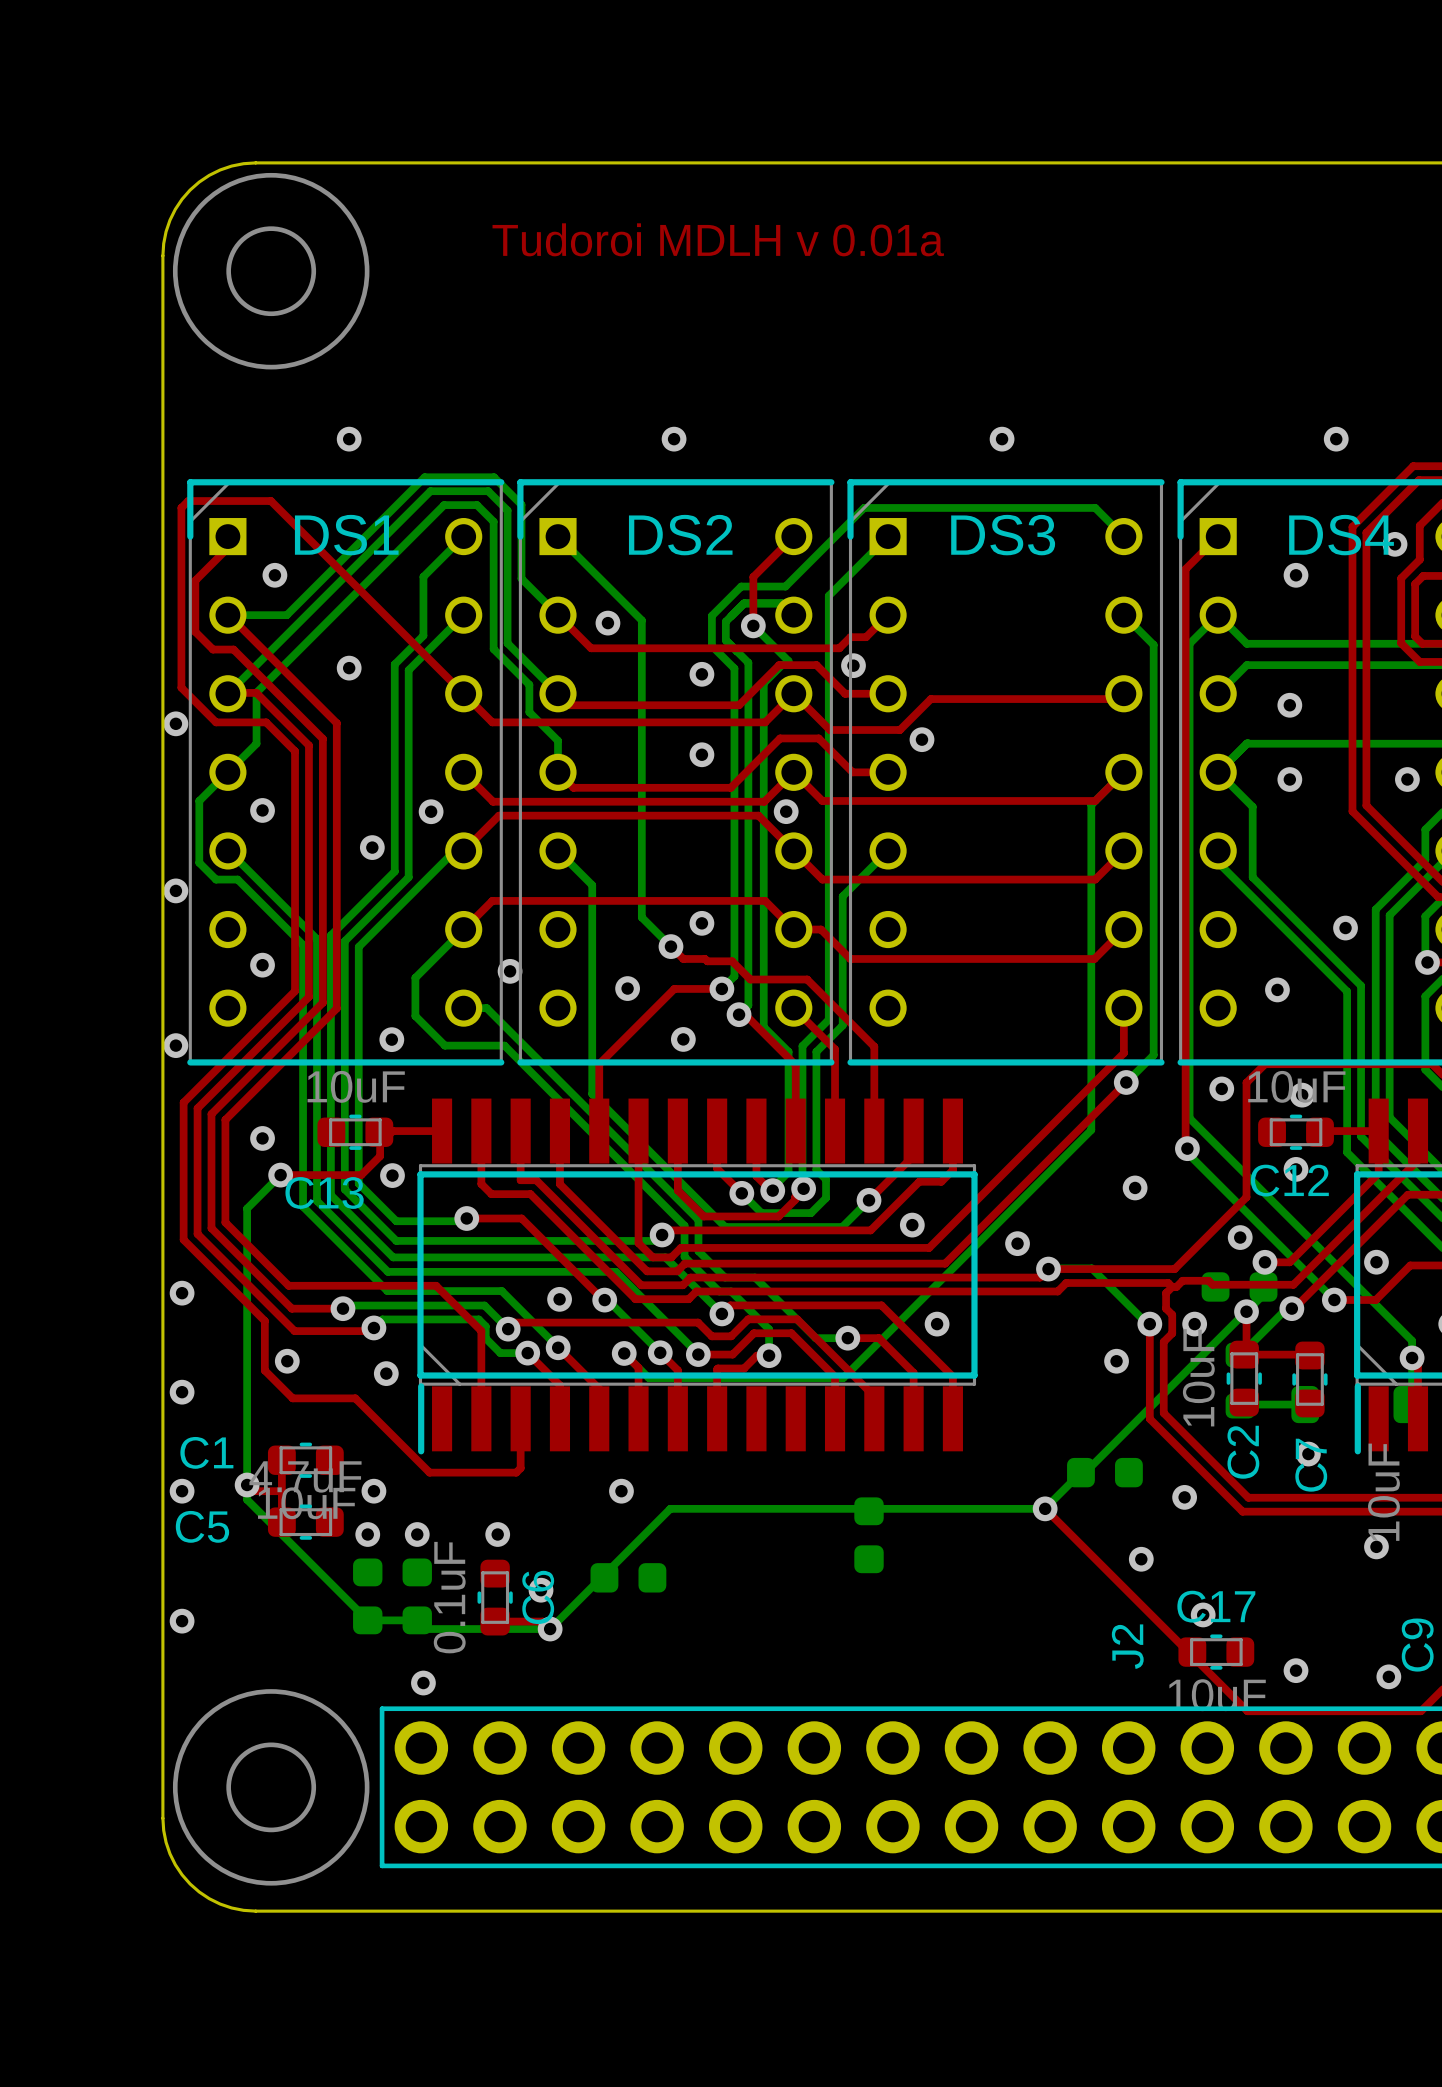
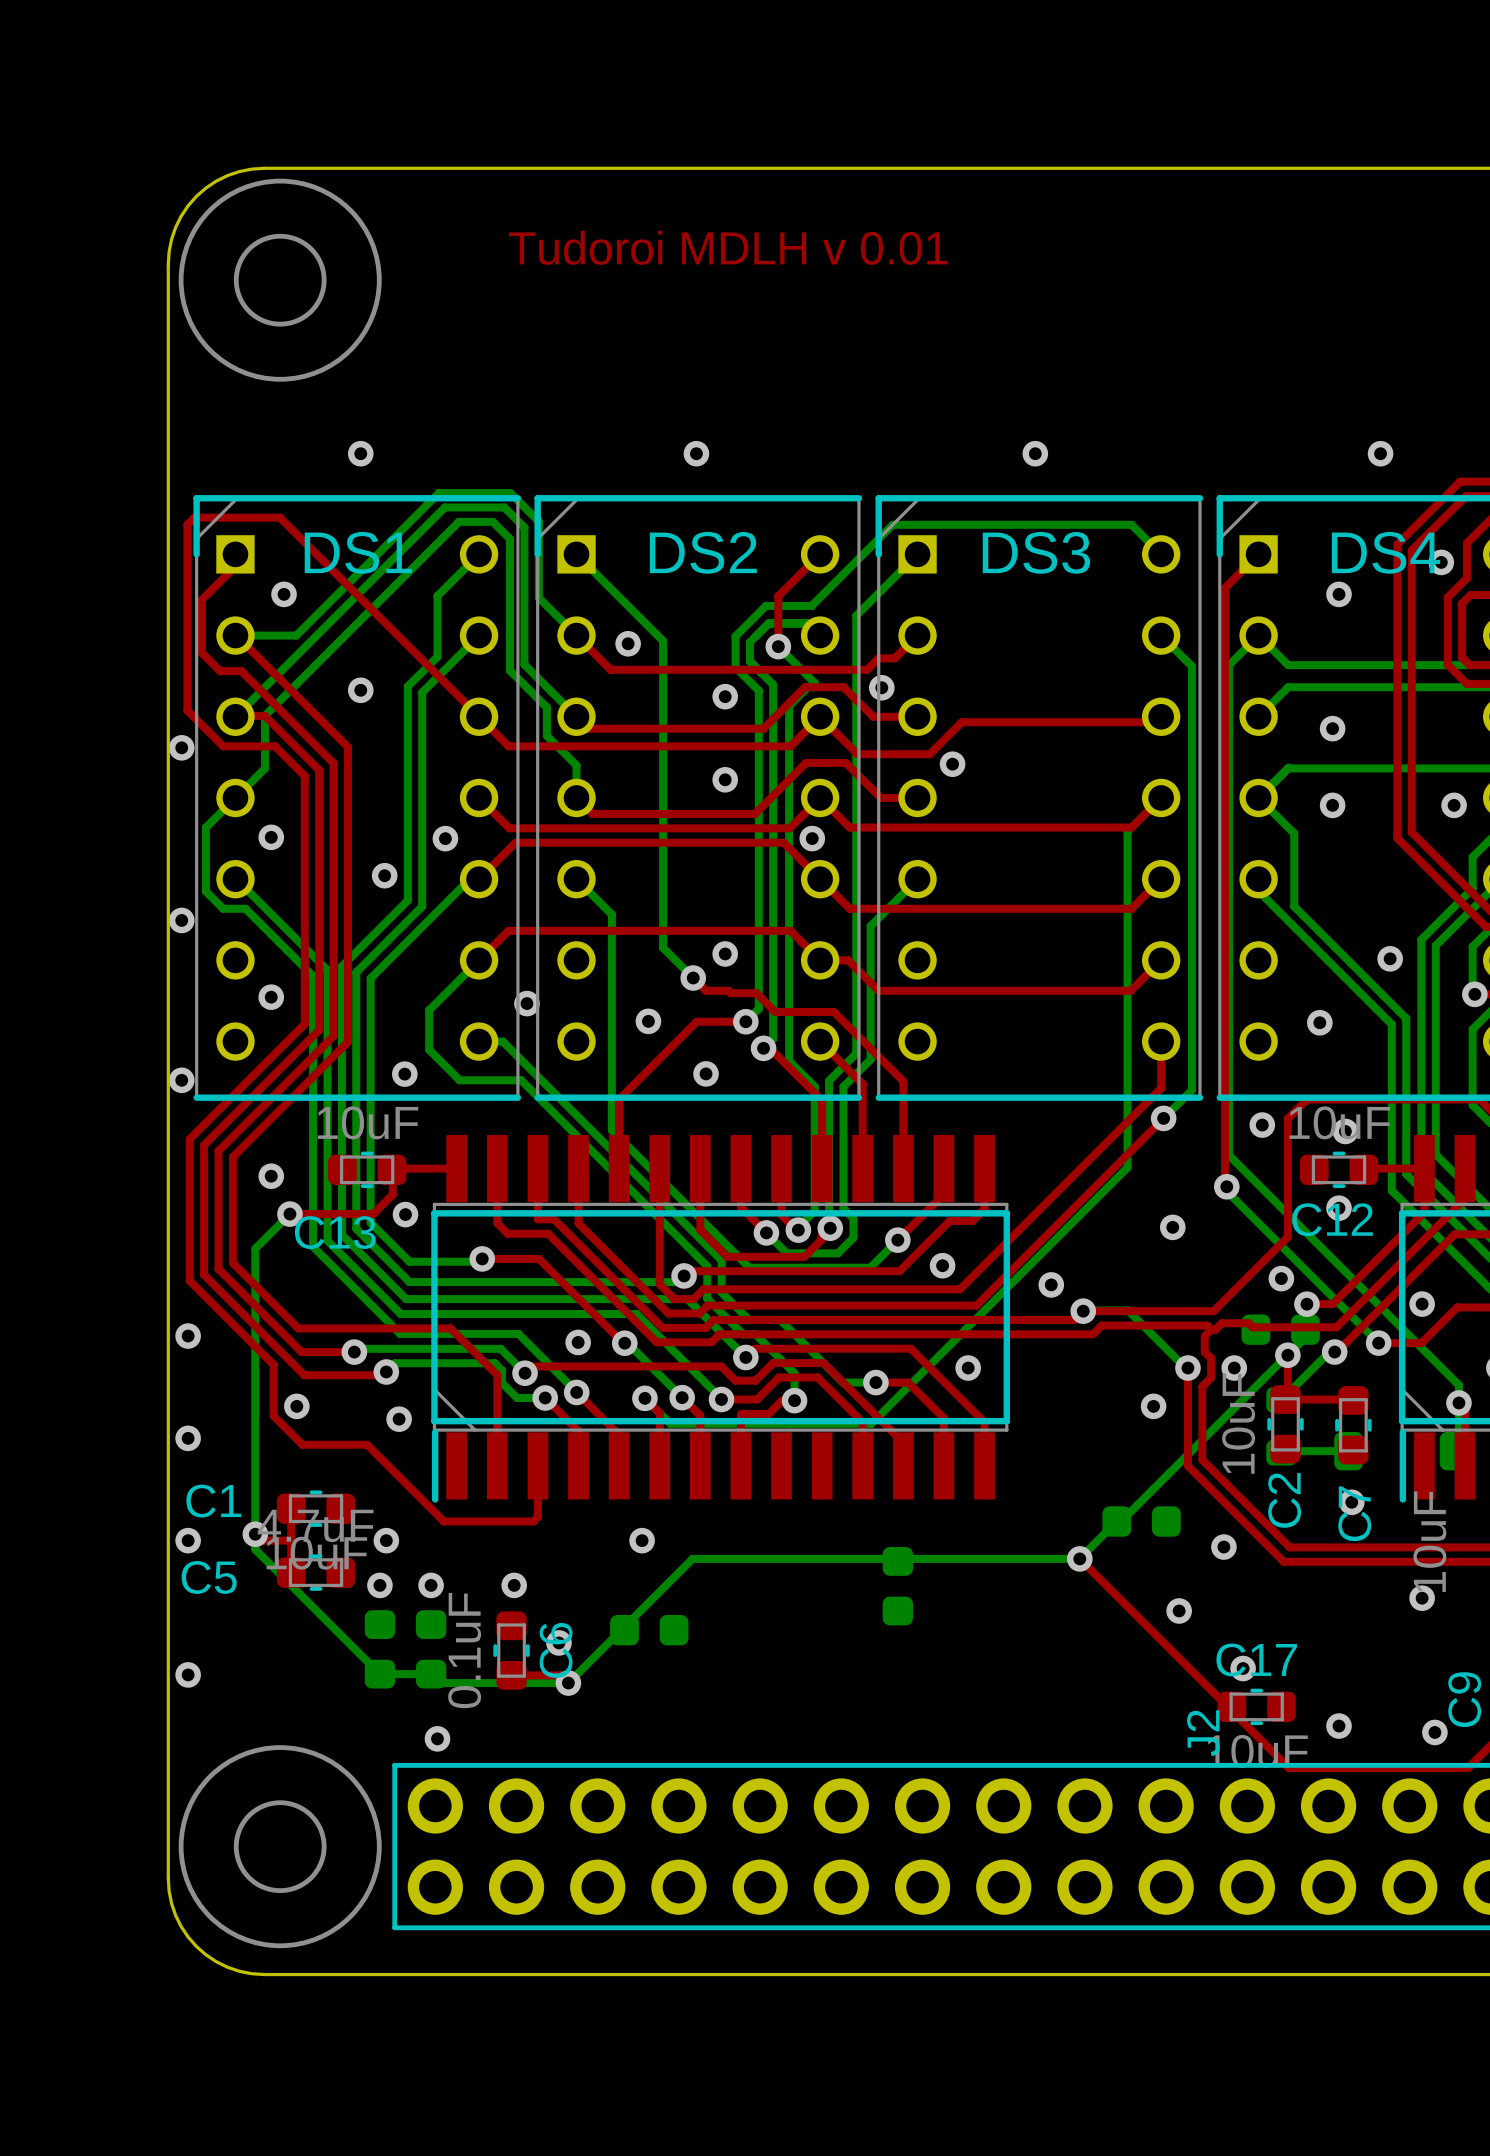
text: Tudoroi MDLH v 0.01a (718, 239) -> Tudoroi MDLH v 0.01 (728, 247)
J2 name position: J2 (1127, 1646) -> J2 (1203, 1733)

